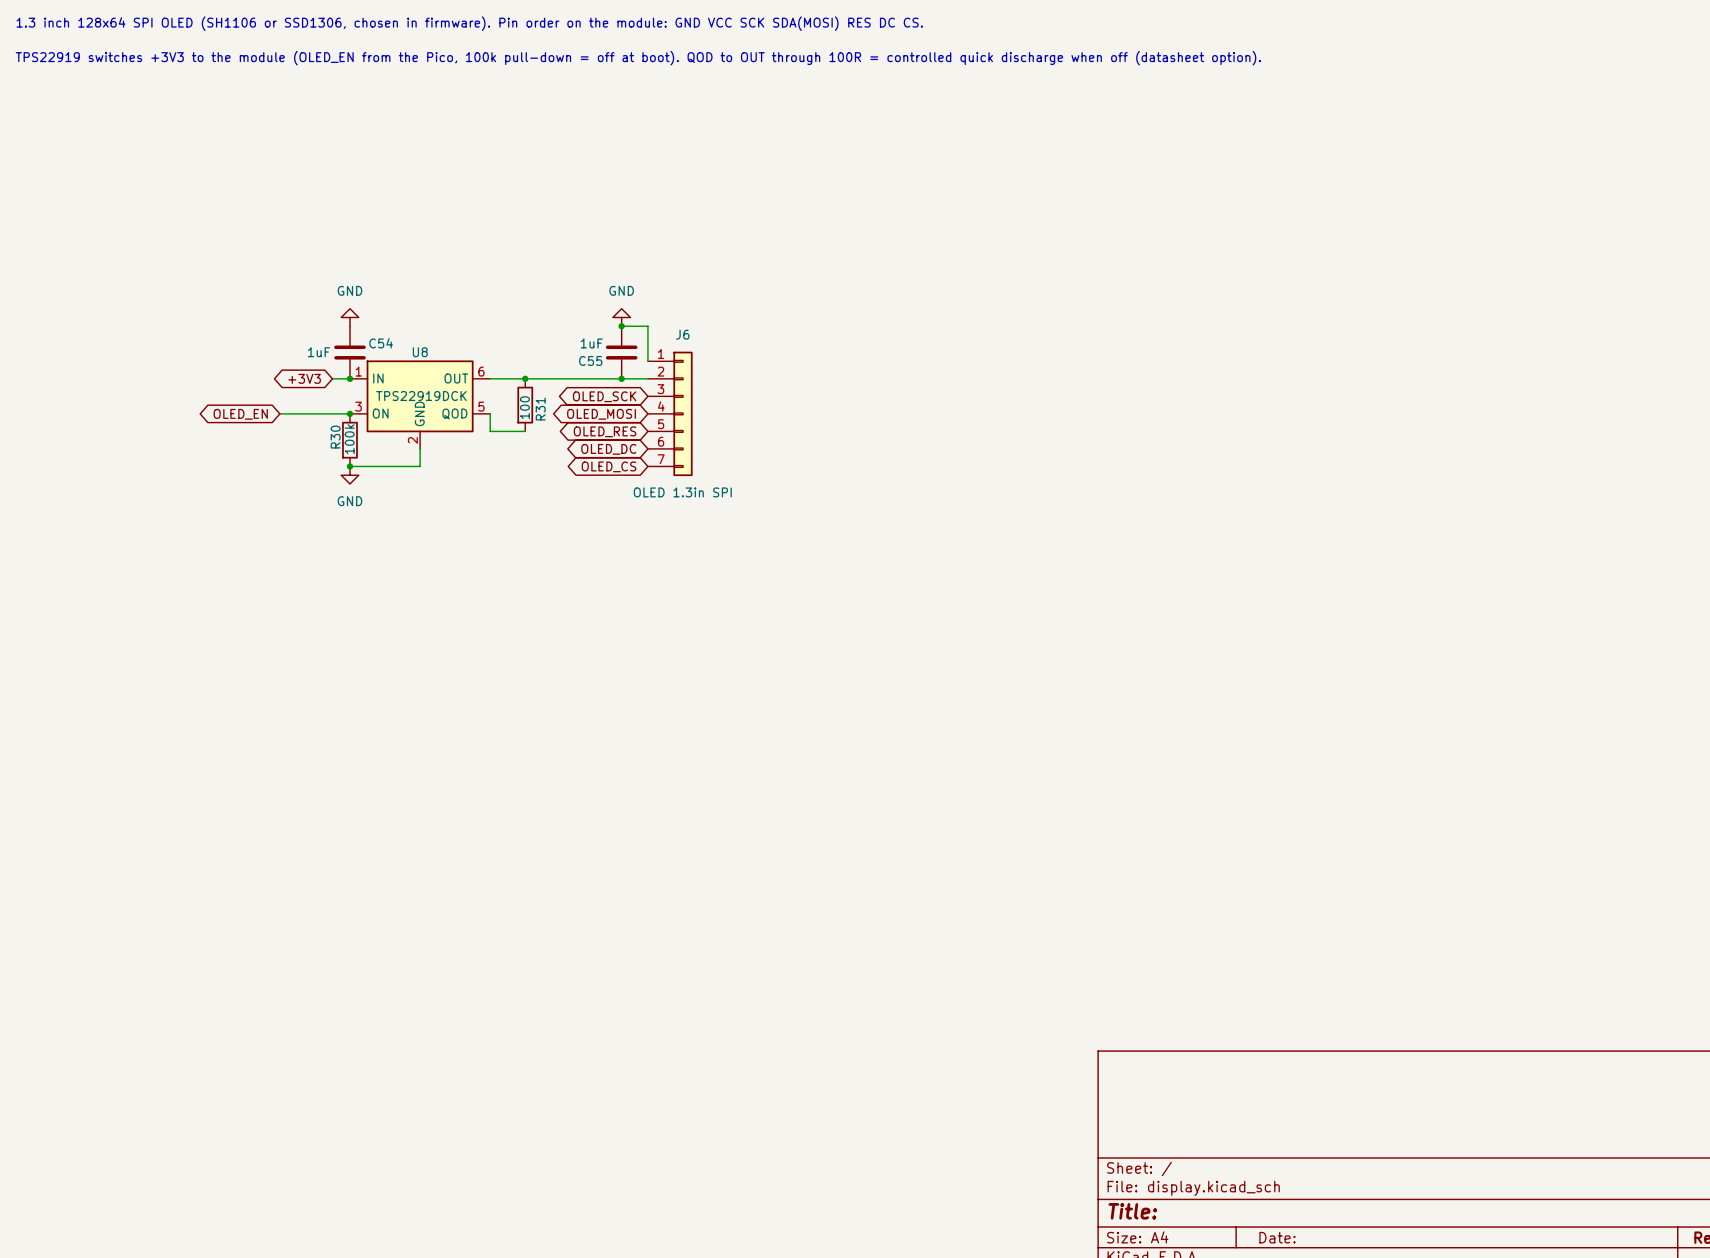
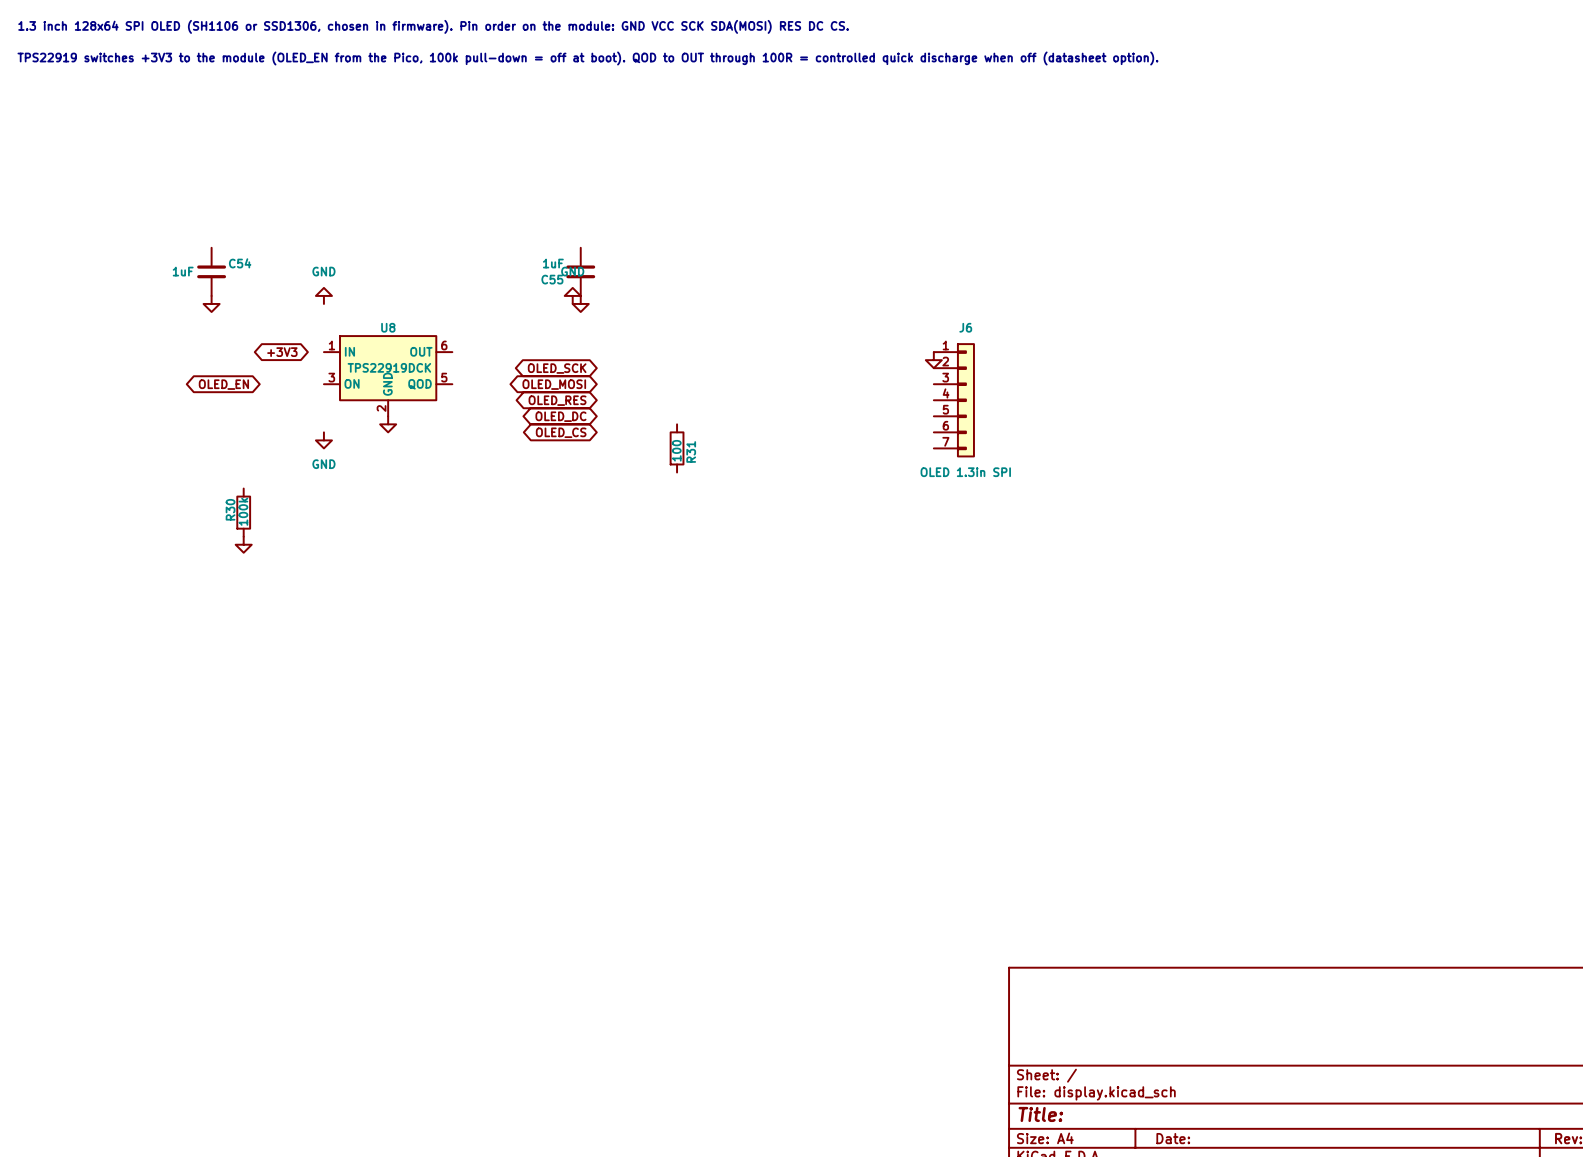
power symbol: none -> (211, 303)
wire: (621, 326) (647, 326) (647, 361) -> none
junction: (621, 326) -> none
power symbol: none -> (580, 303)
C54 position: (349, 352) -> (211, 271)
C55 position: (621, 352) -> (580, 271)
wire: (332, 378) (349, 378) -> none
junction: (349, 378) -> none
wire: (490, 378) (647, 378) -> none
junction: (525, 378) -> none
junction: (621, 378) -> none
power symbol: none -> (933, 360)
R31 position: (525, 405) -> (677, 448)
wire: (279, 413) (349, 413) -> none
junction: (349, 413) -> none
wire: (490, 413) (490, 431) (525, 431) -> none
J6 position: (670, 413) -> (954, 400)
R30 position: (349, 440) -> (243, 512)
wire: (420, 448) (420, 466) (349, 466) -> none
power symbol: none -> (388, 424)
junction: (349, 466) -> none
power symbol: none -> (243, 544)

